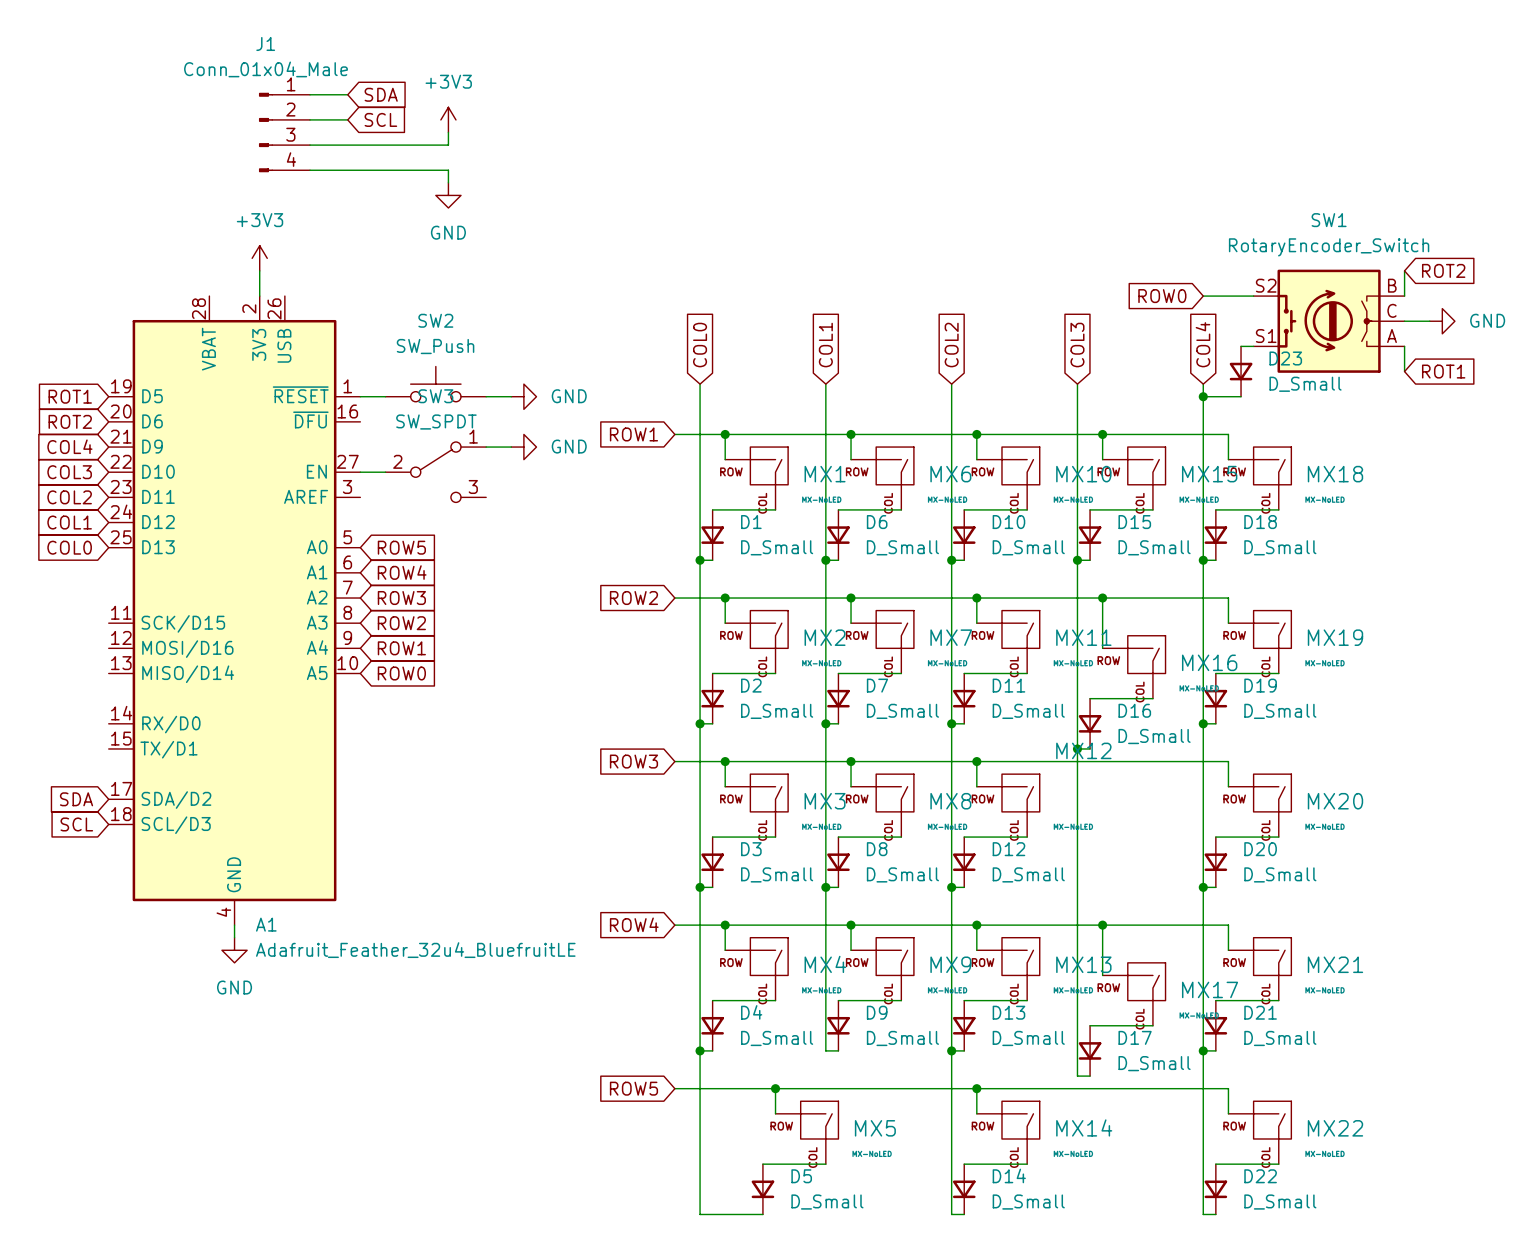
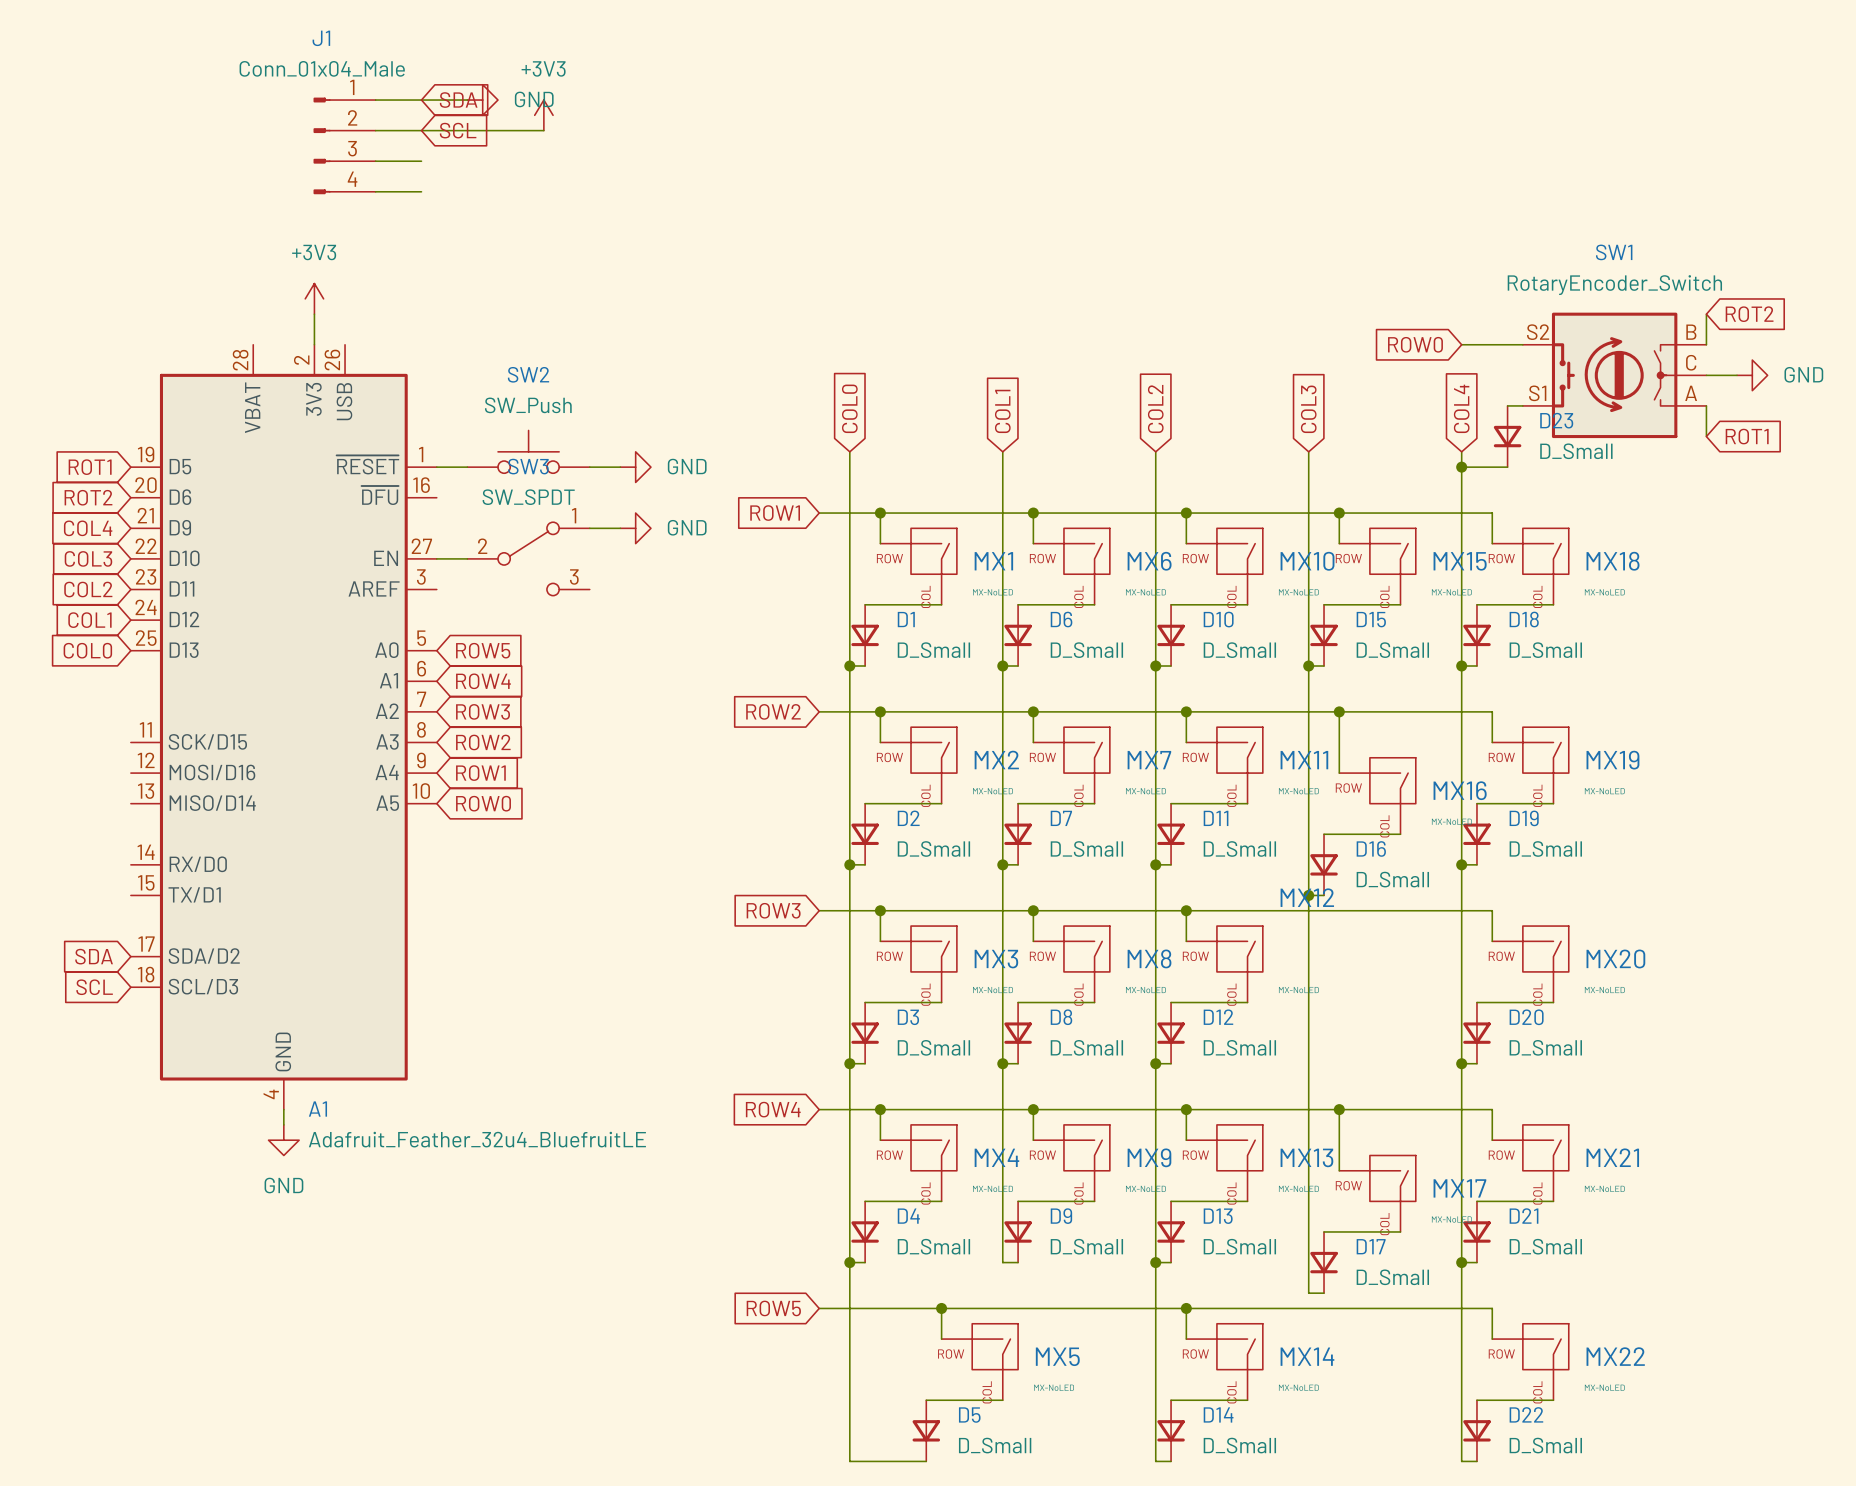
wire: none -> (421, 100) (467, 100)
wire: none -> (421, 130) (543, 130)
power symbol position: +3V3 (448, 119) -> +3V3 (543, 115)
wire: (448, 132) (448, 145) (347, 145) -> none
wire: (347, 170) (448, 170) (448, 182) -> none
power symbol rotation: 0° (448, 195) -> 90° counterclockwise (482, 100)
power symbol position: GND (448, 195) -> GND (482, 100)

